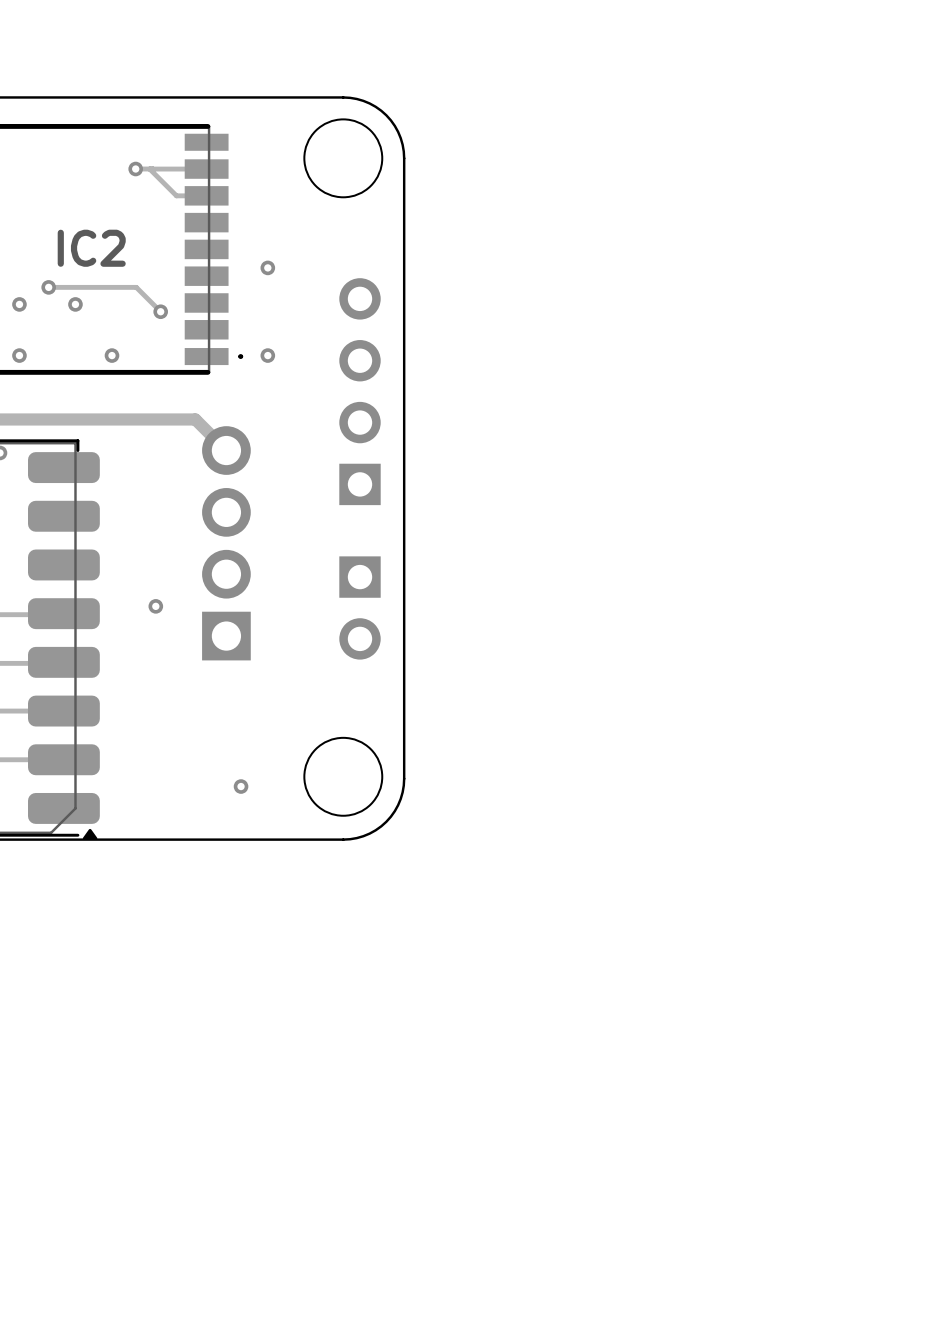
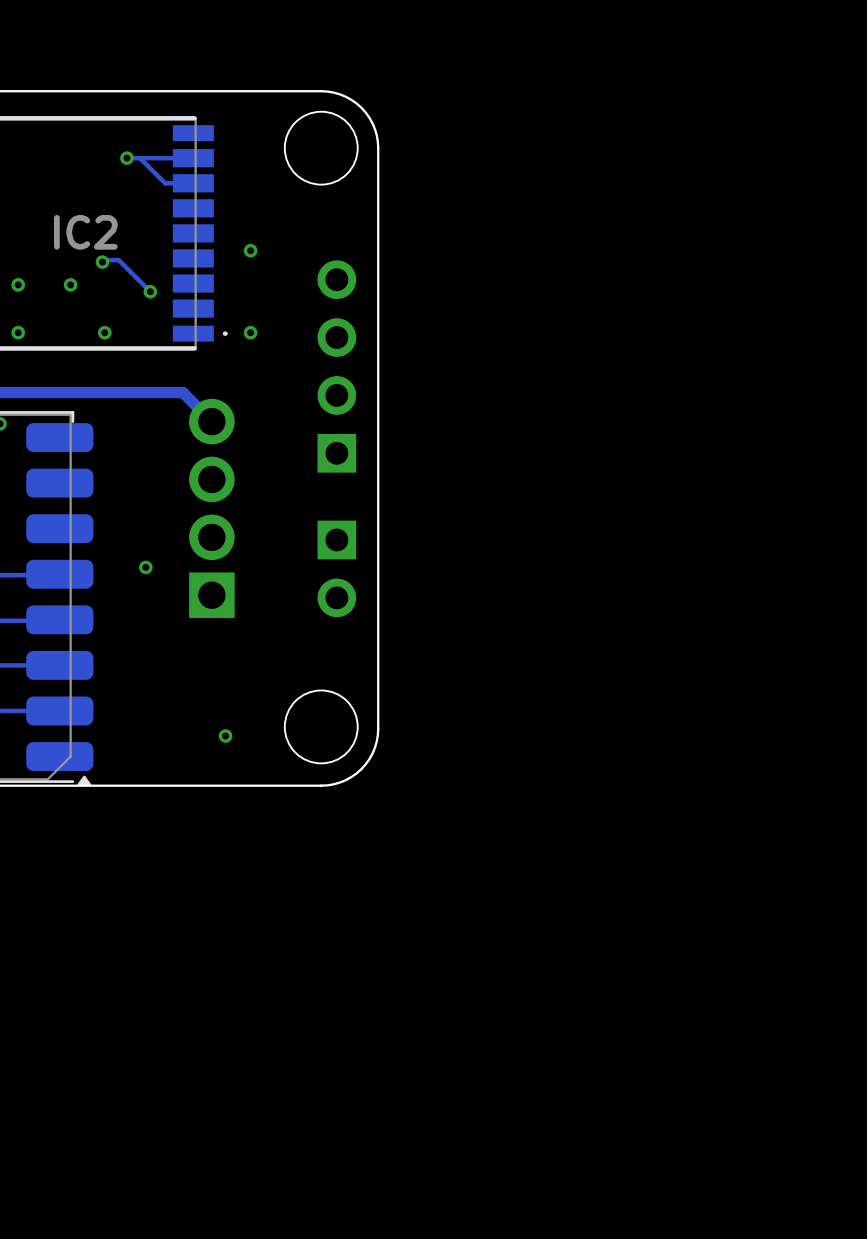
via position: (48, 287) -> (102, 262)
track: (136, 287) (48, 287) -> (127, 268) (118, 260) (104, 260) (102, 262)

